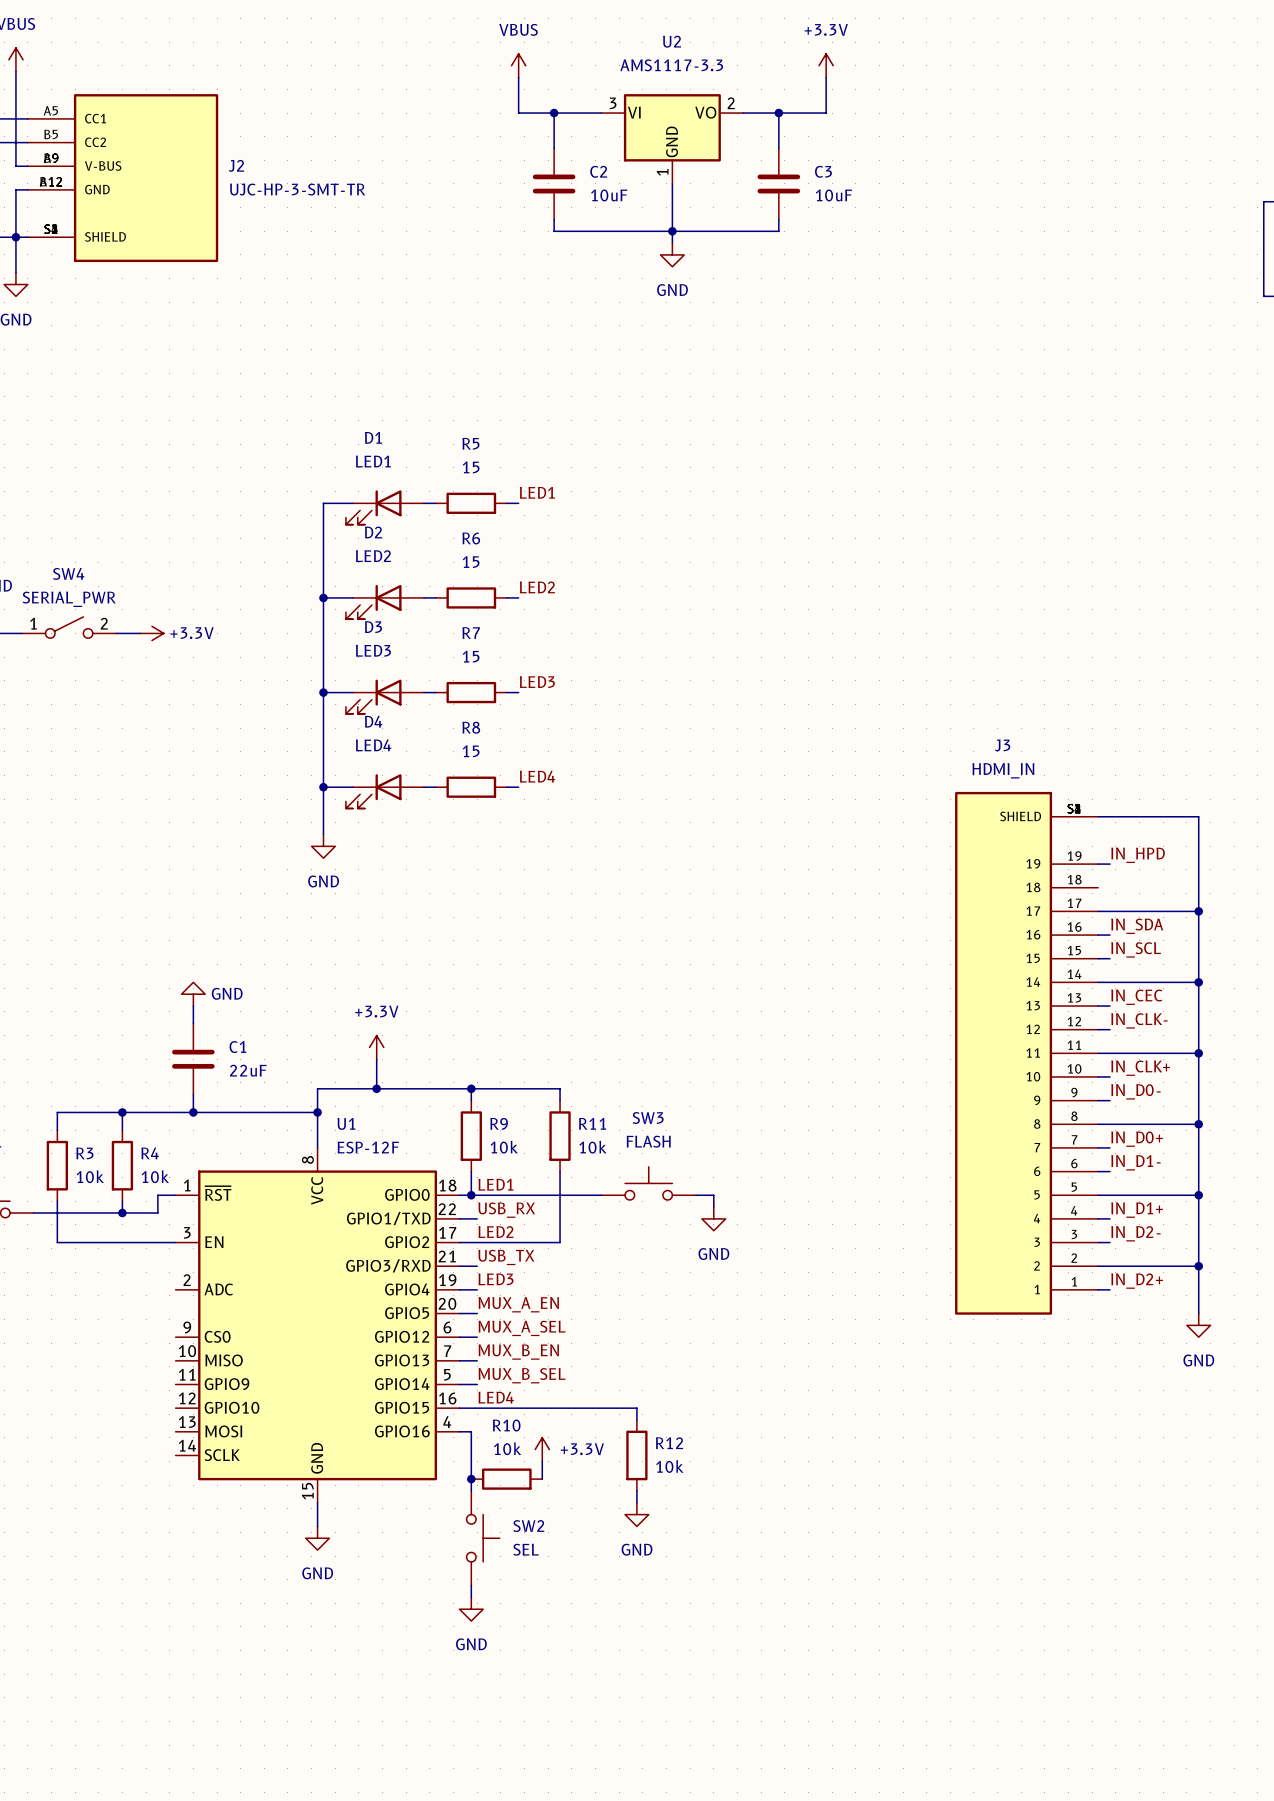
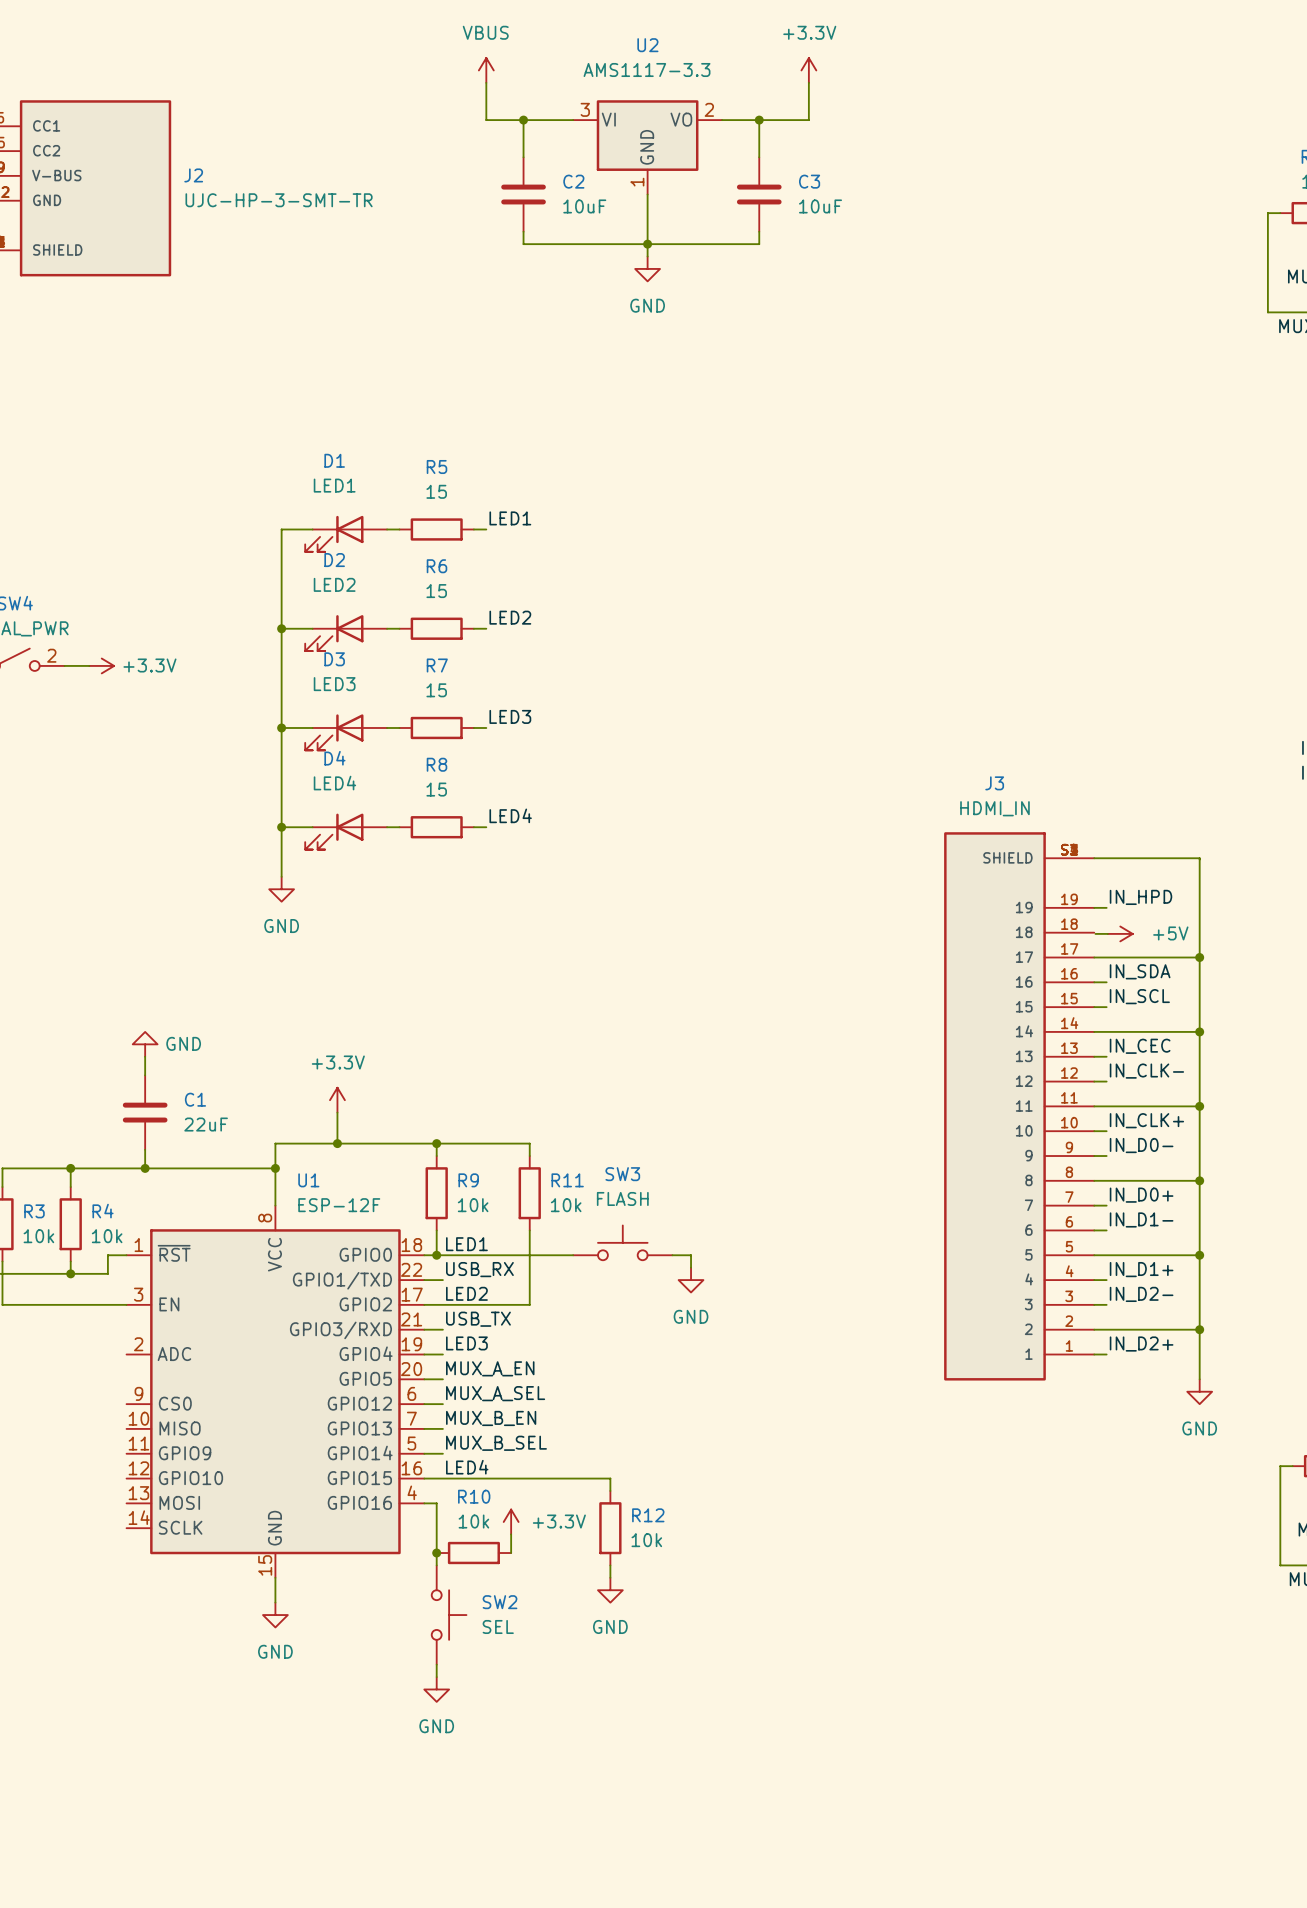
wire: none -> (1095, 933) (1107, 933)
power symbol: none -> +5V (1120, 933)

